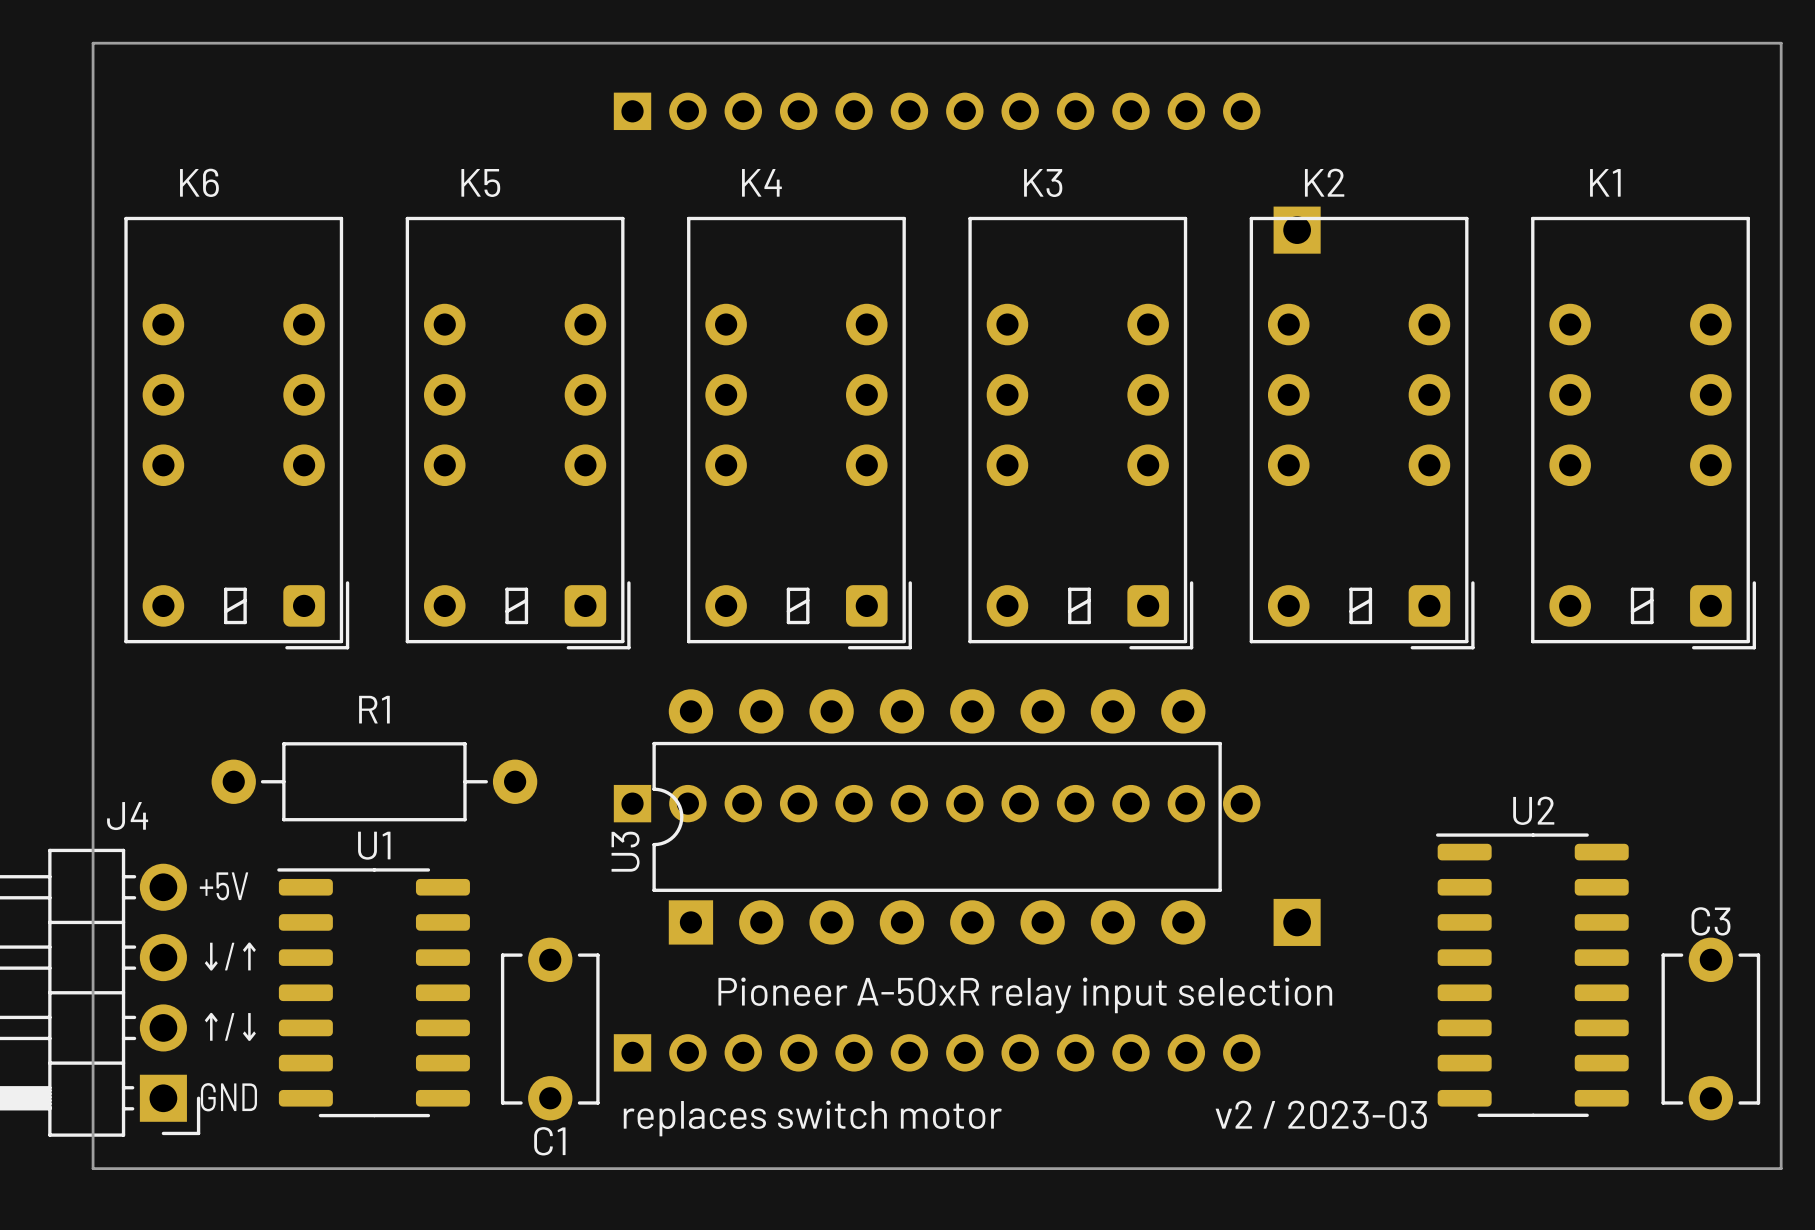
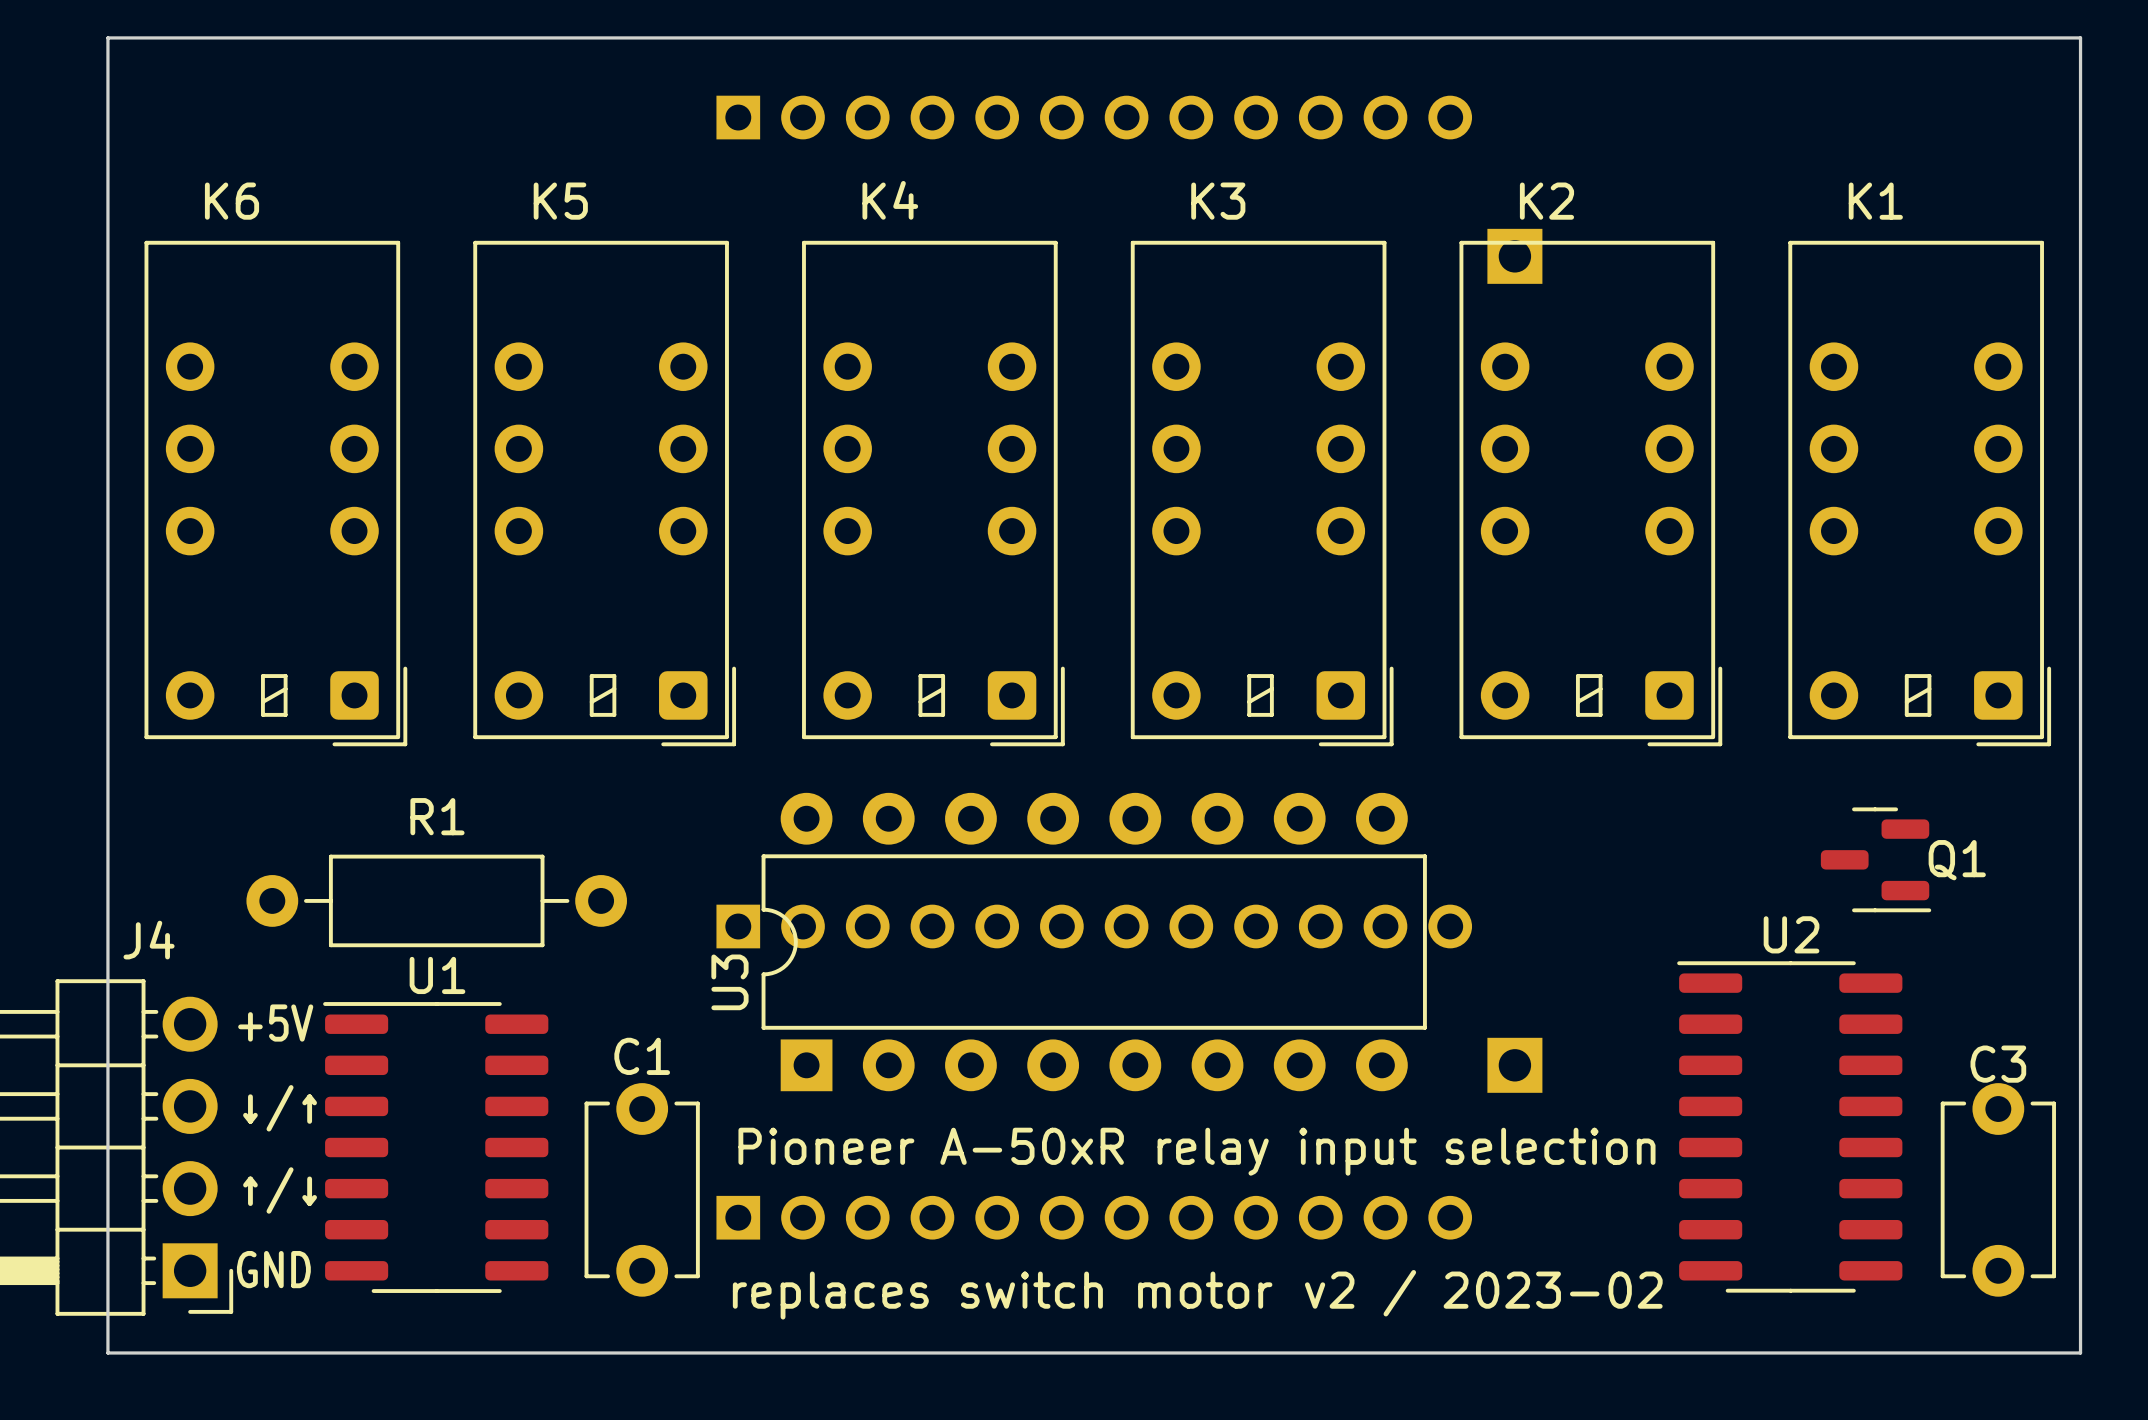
Q1: none -> (1876, 859)
text: v2 / 2023-03 (1321, 1114) -> v2 / 2023-02 (1483, 1293)
C1 name position: C1 (549, 1141) -> C1 (642, 1056)

